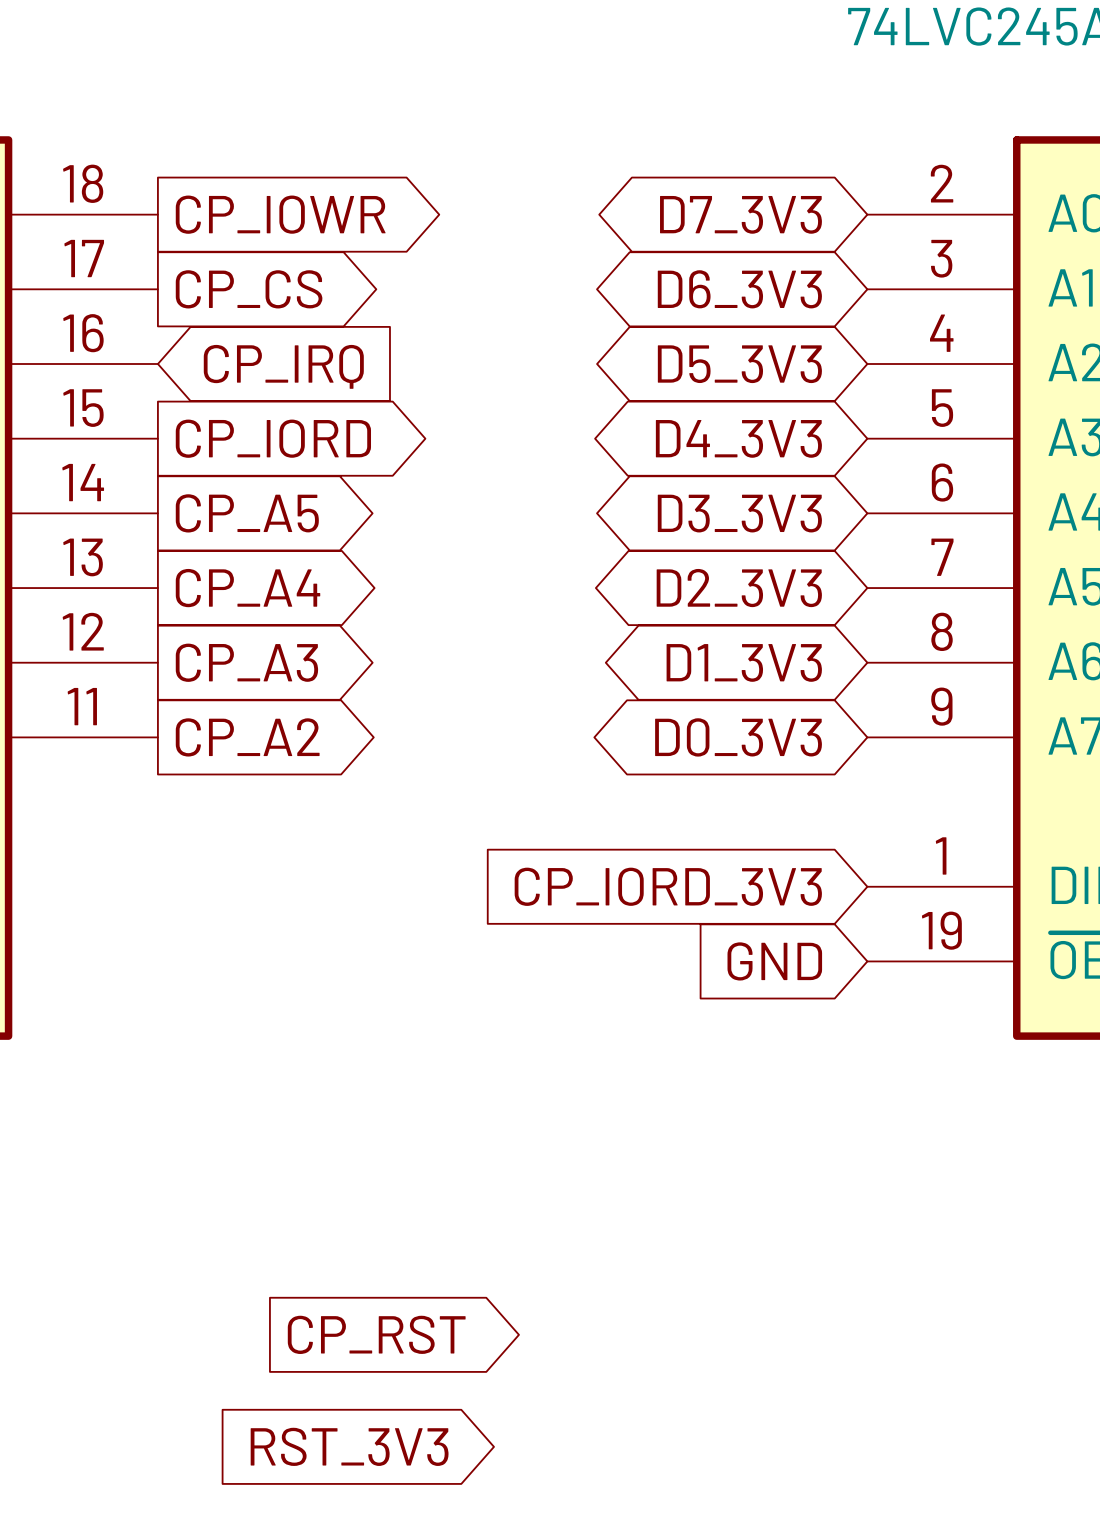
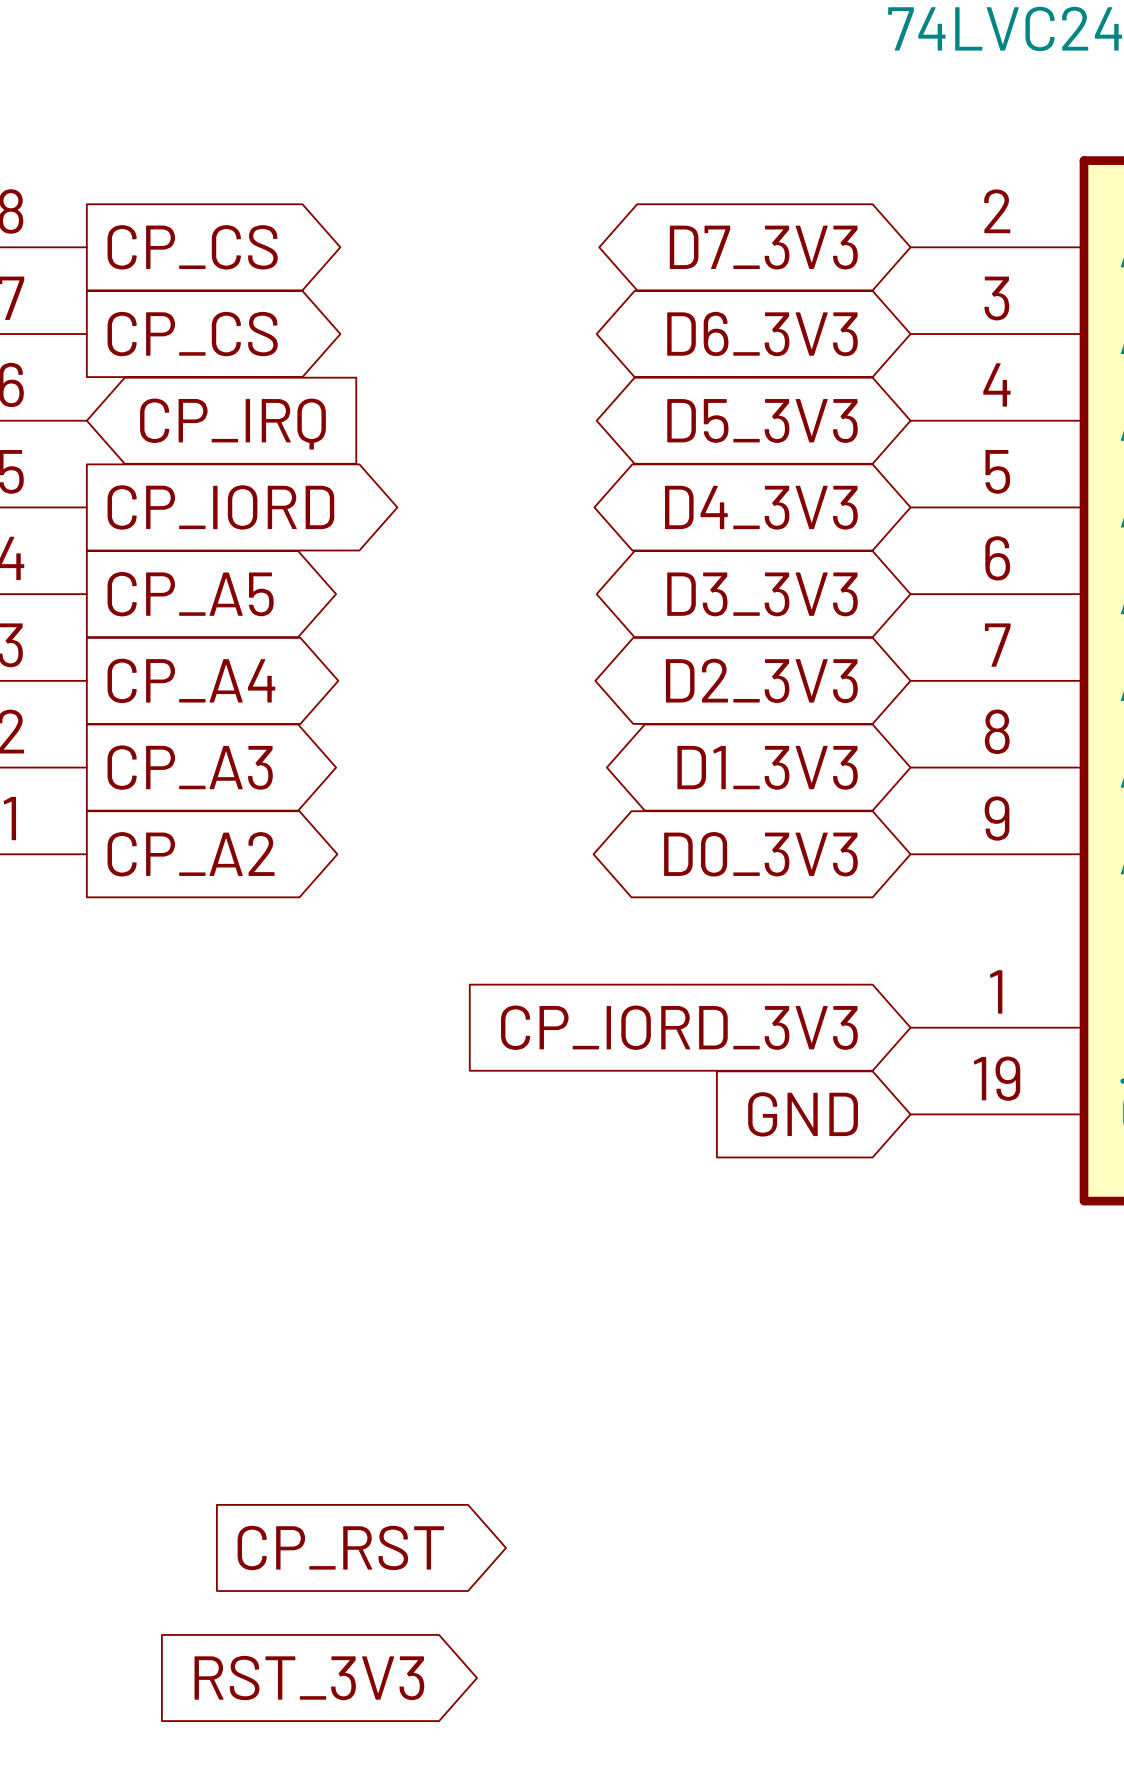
global label: CP_IOWR (280, 214) -> CP_CS (192, 247)

